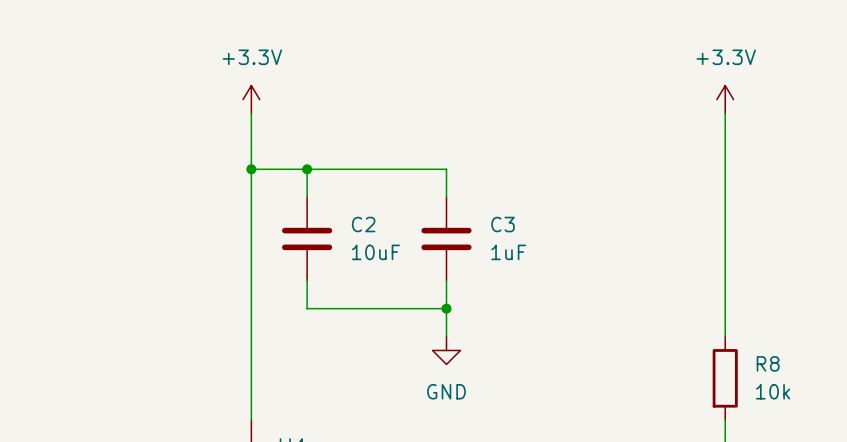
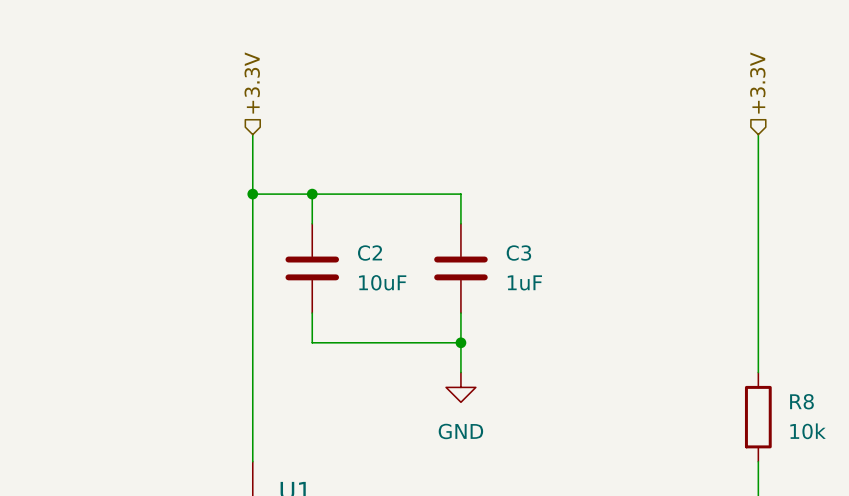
hierarchical label: none -> +3.3V (252, 83)
hierarchical label: none -> +3.3V (757, 83)
power symbol: +3.3V (251, 99) -> none
power symbol: +3.3V (725, 99) -> none

